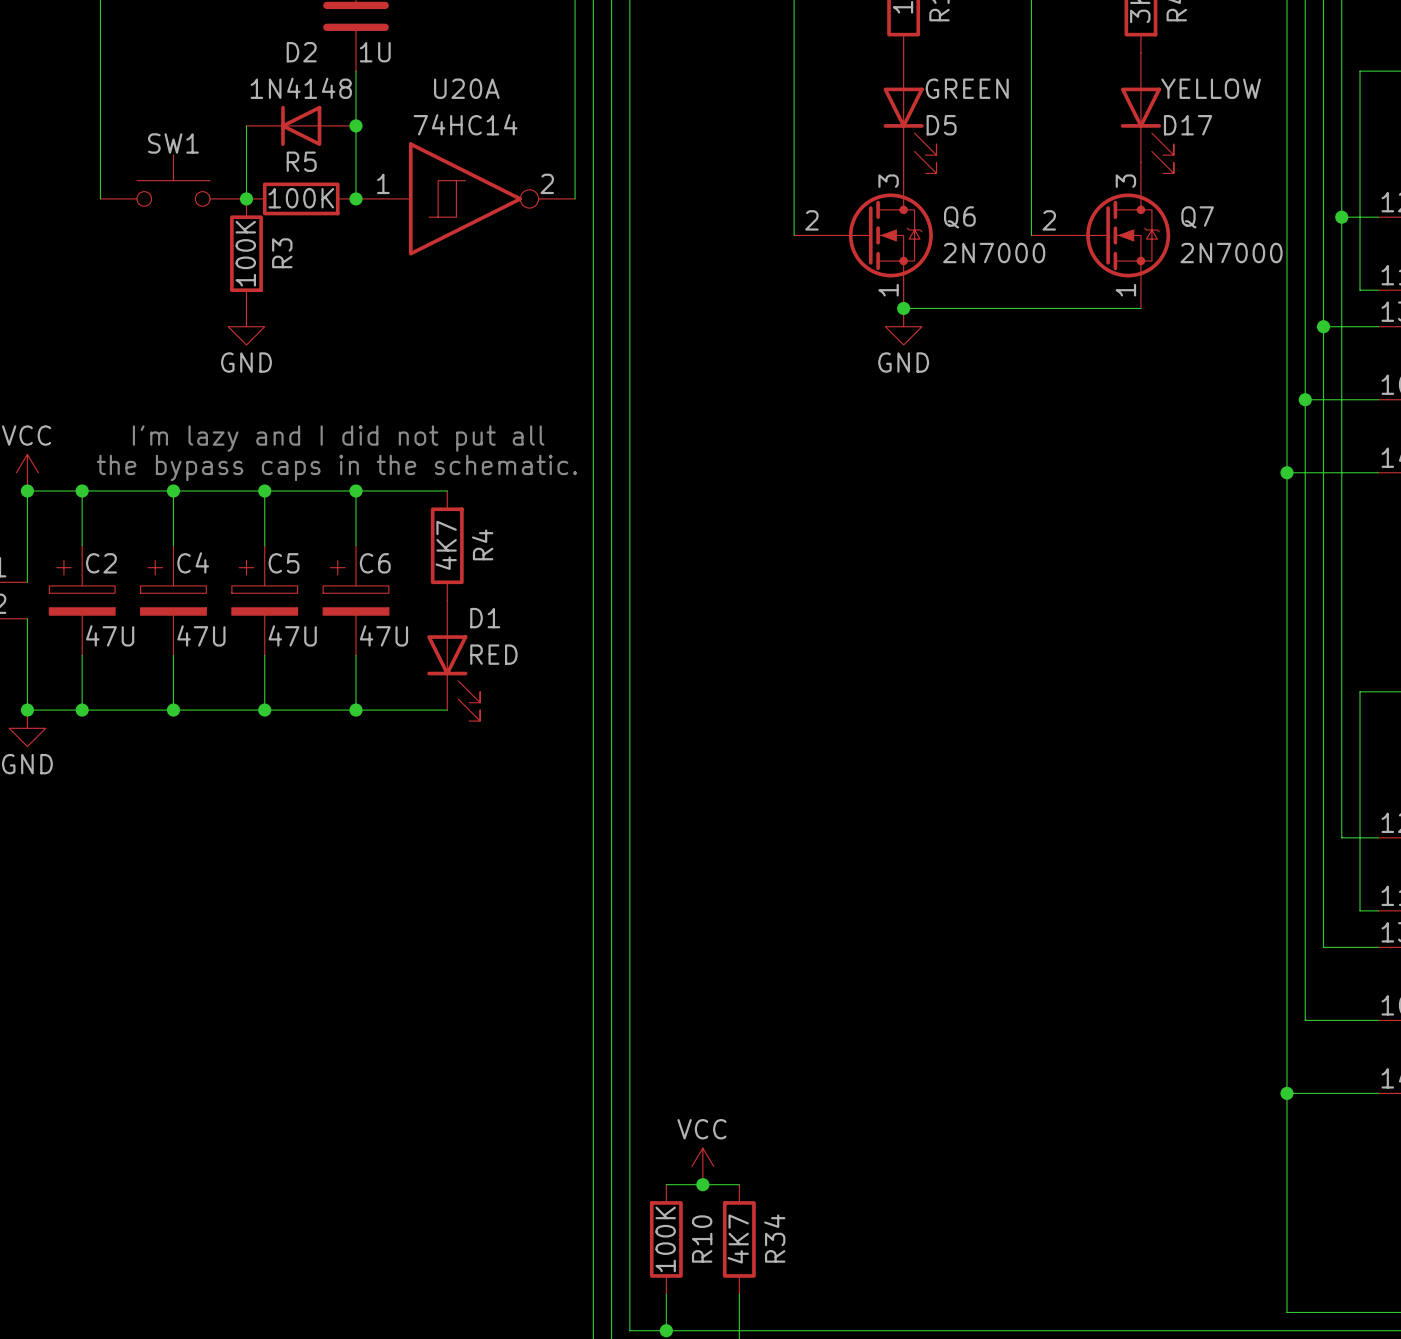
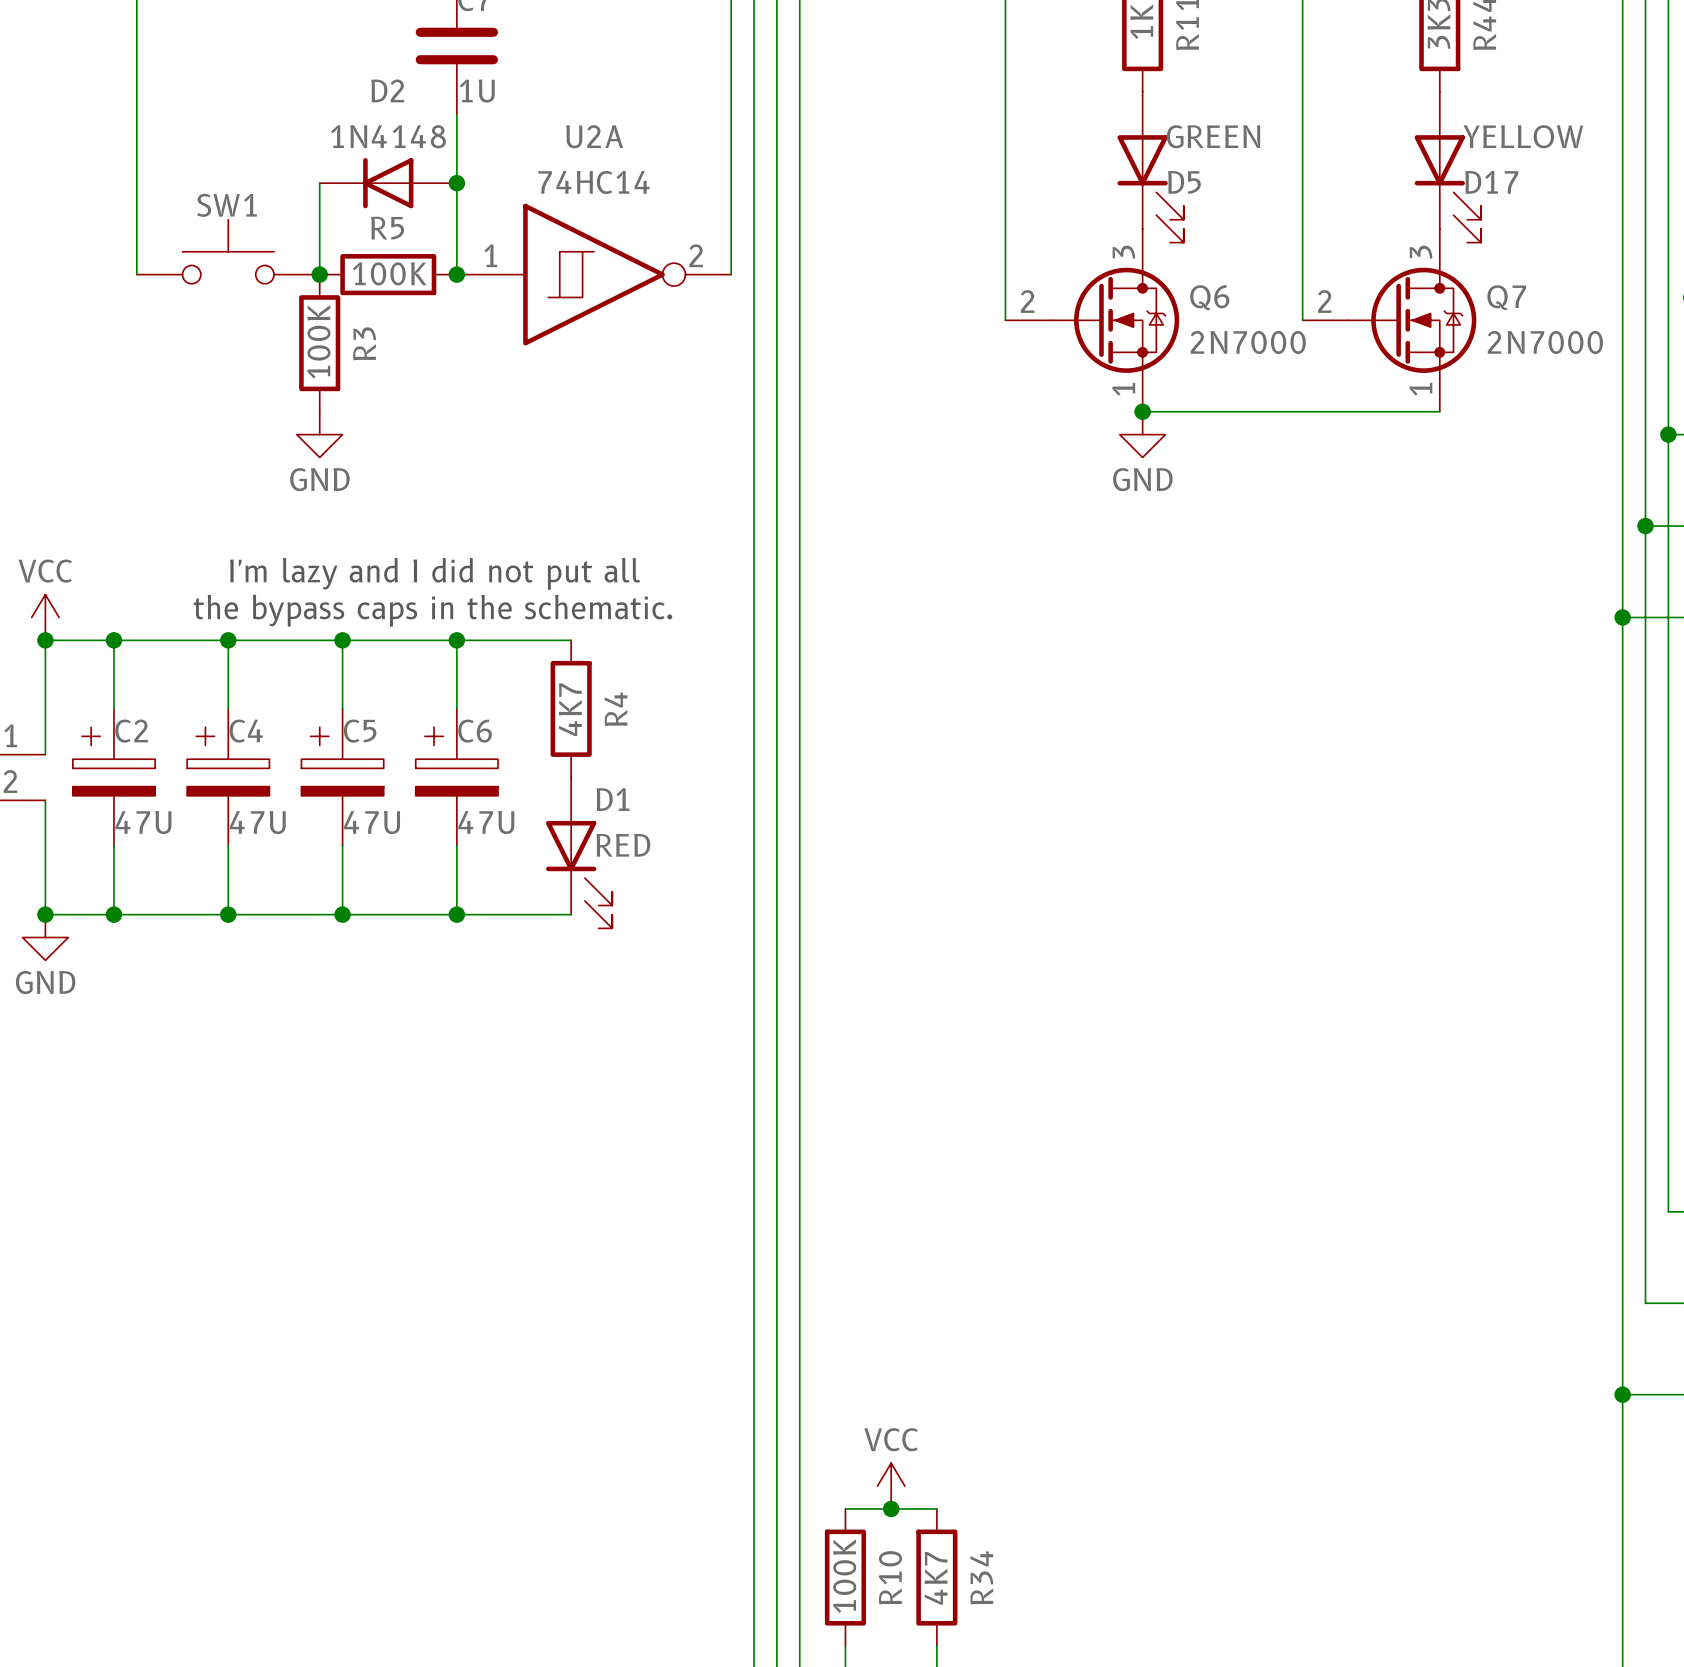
U20A name: U20A (466, 88) -> U2A (594, 136)

